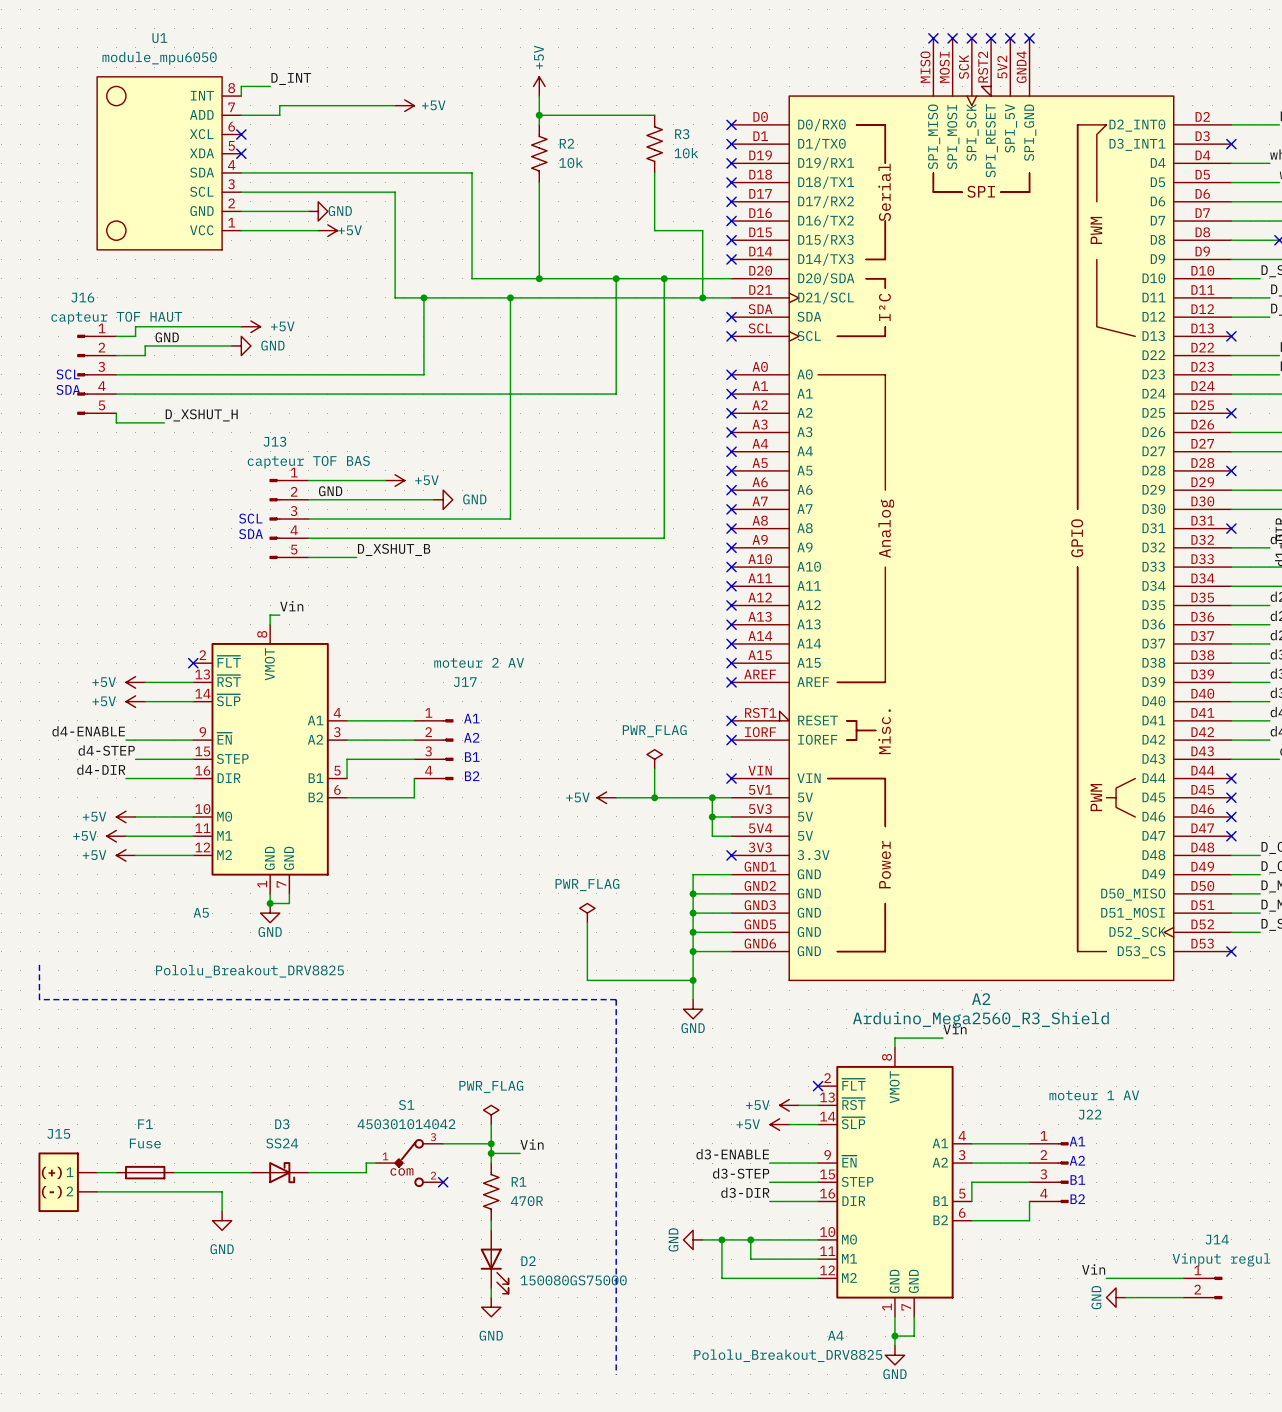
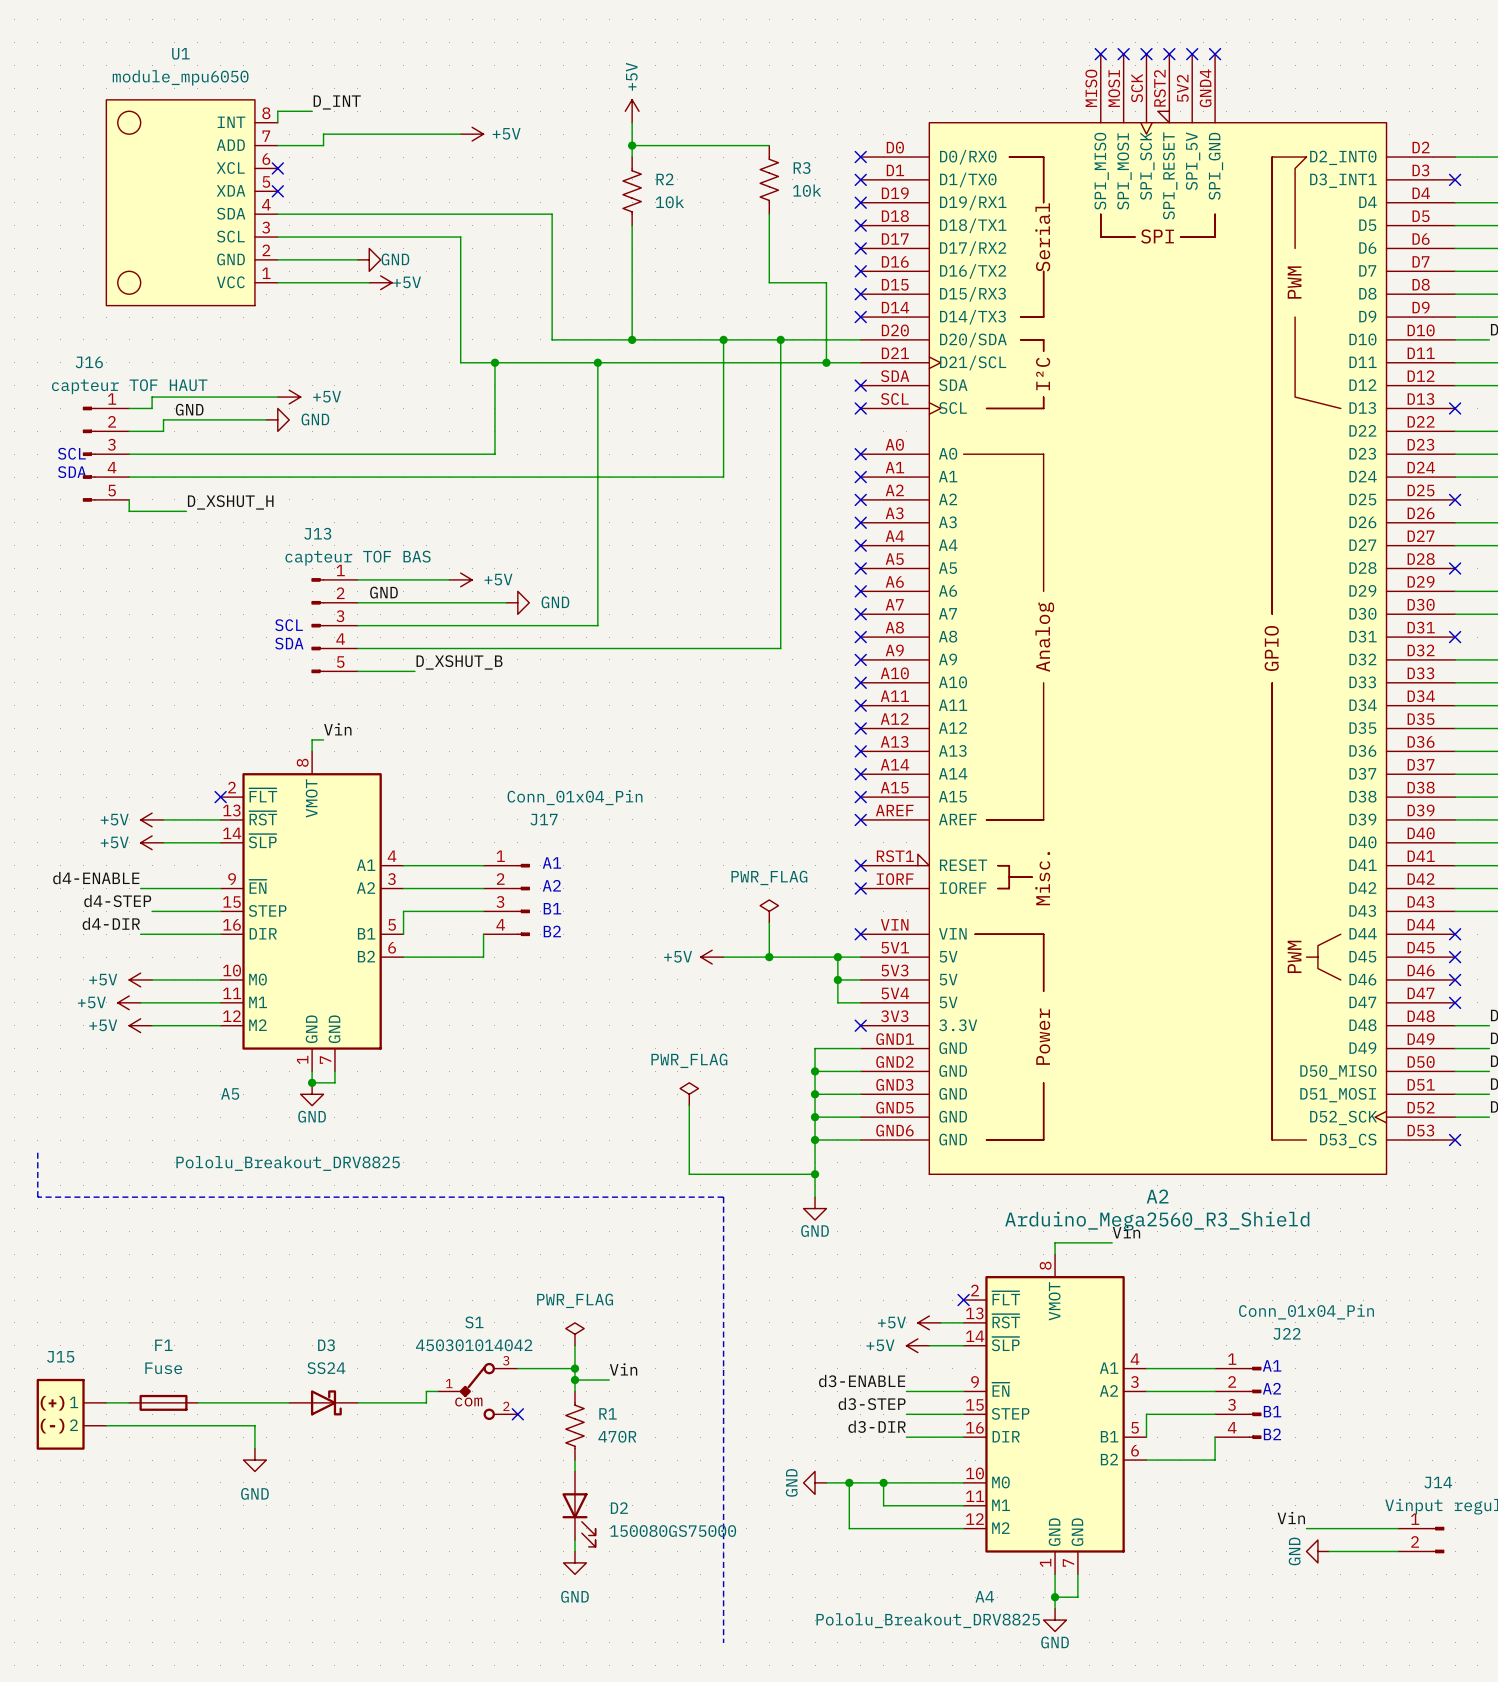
J17 value: moteur 2 AV (479, 662) -> Conn_01x04_Pin (575, 797)
J22 value: moteur 1 AV (1094, 1095) -> Conn_01x04_Pin (1306, 1311)

